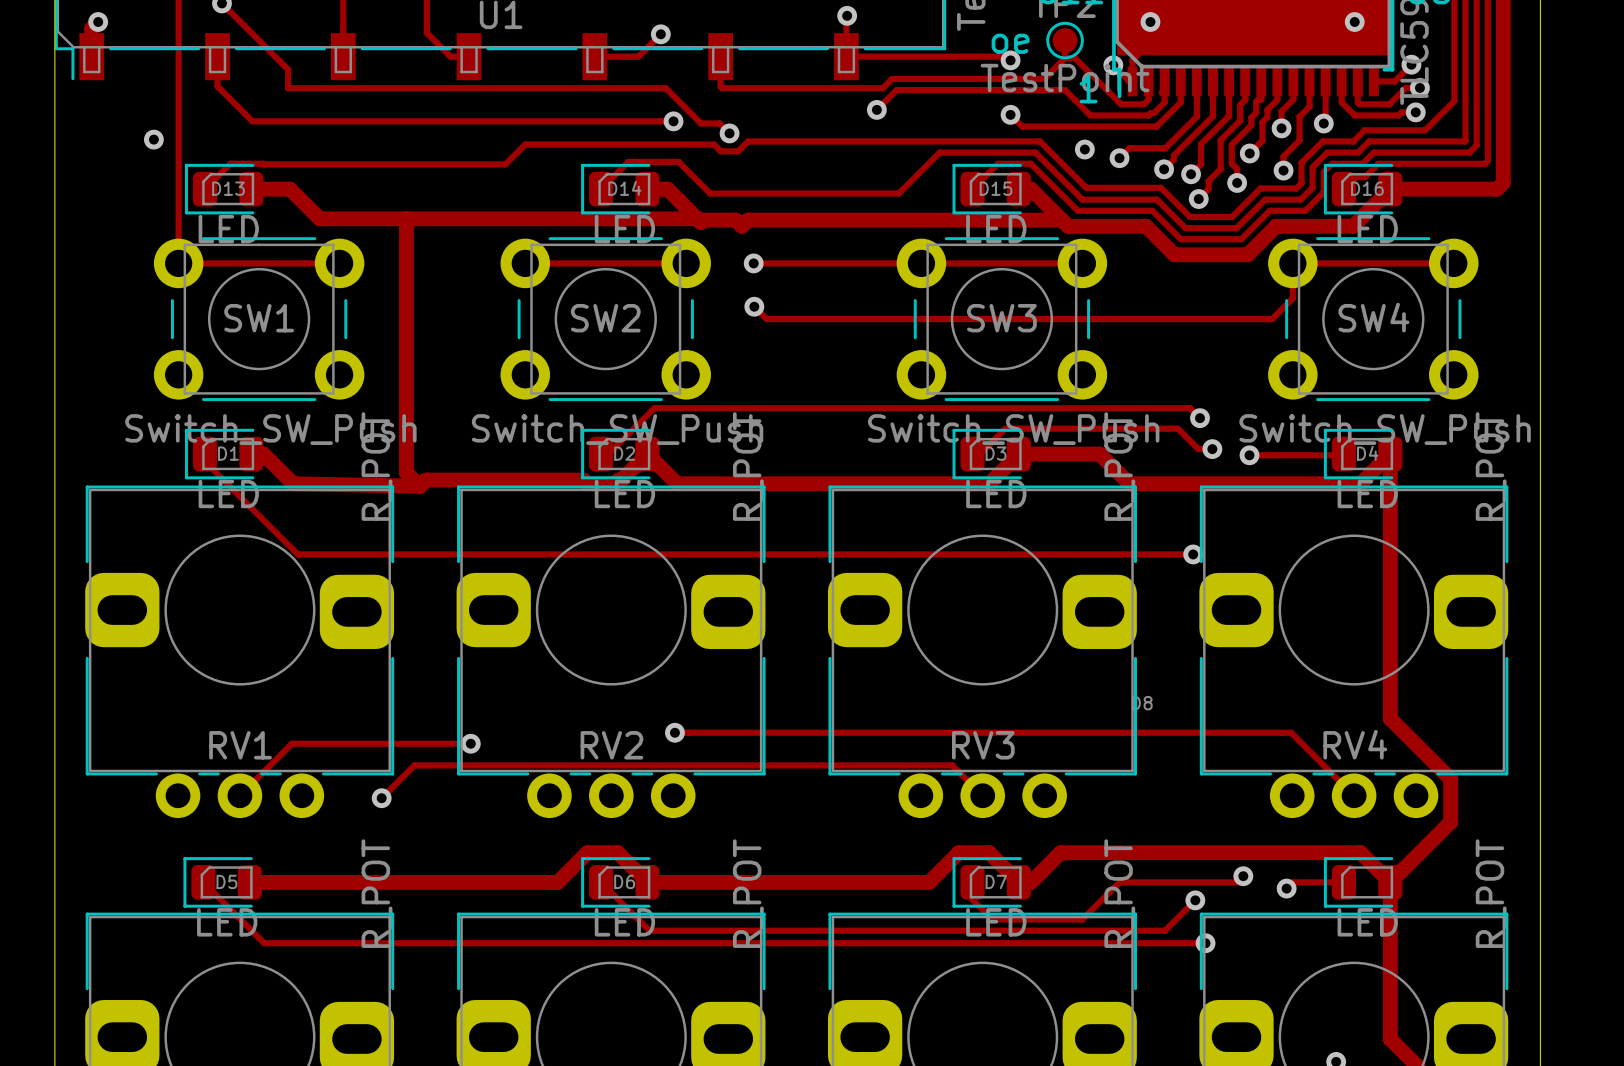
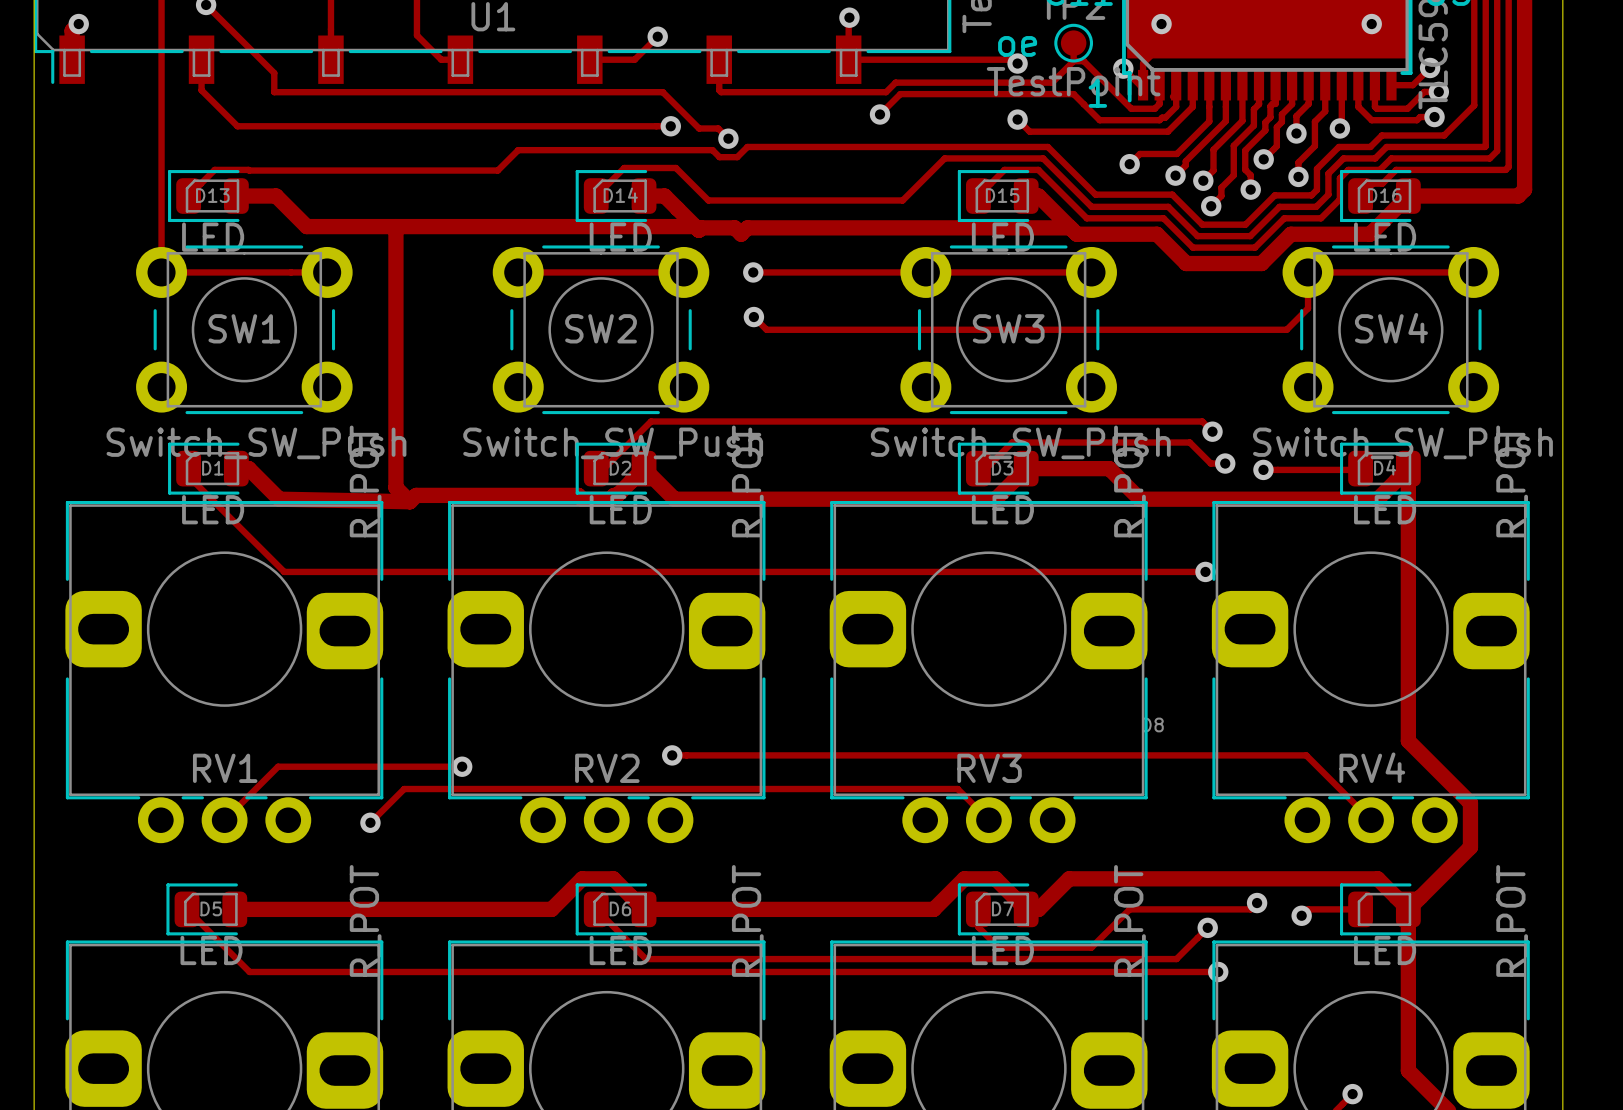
via: (153, 139) -> none
via: (1084, 149) -> none

